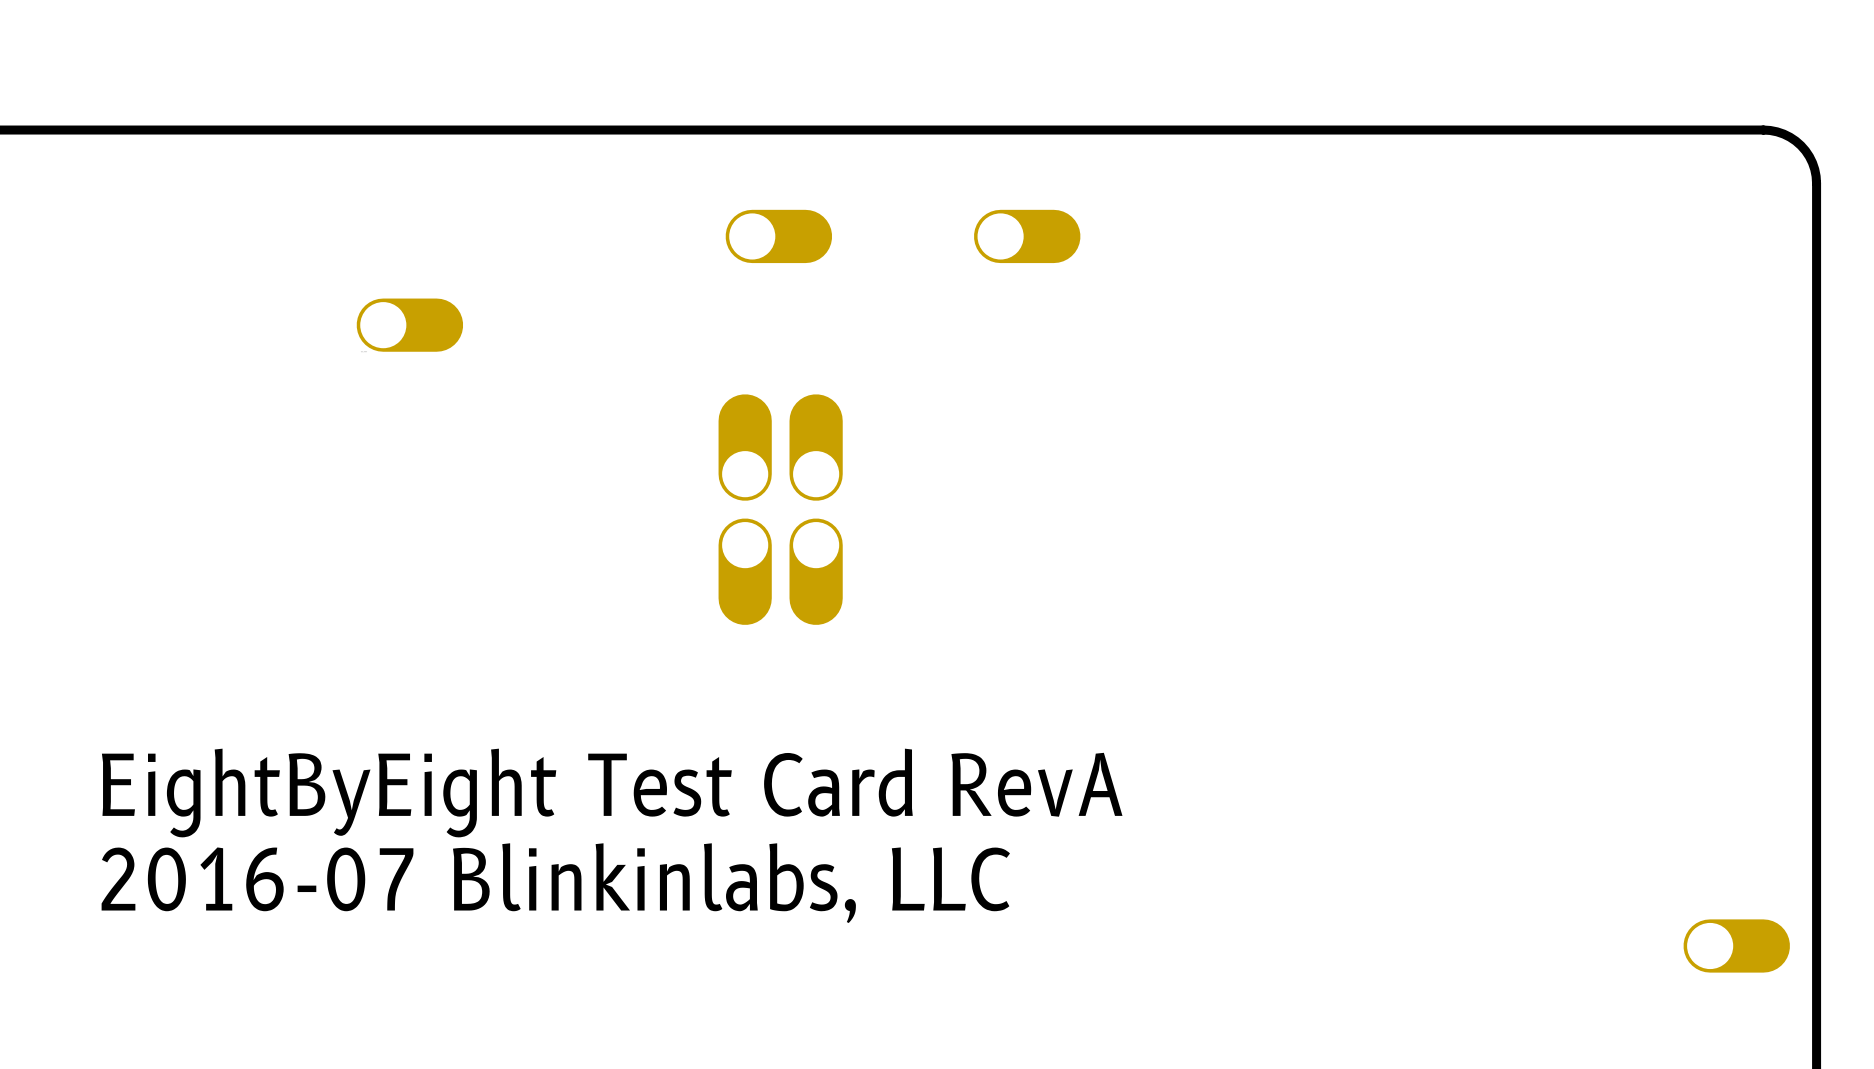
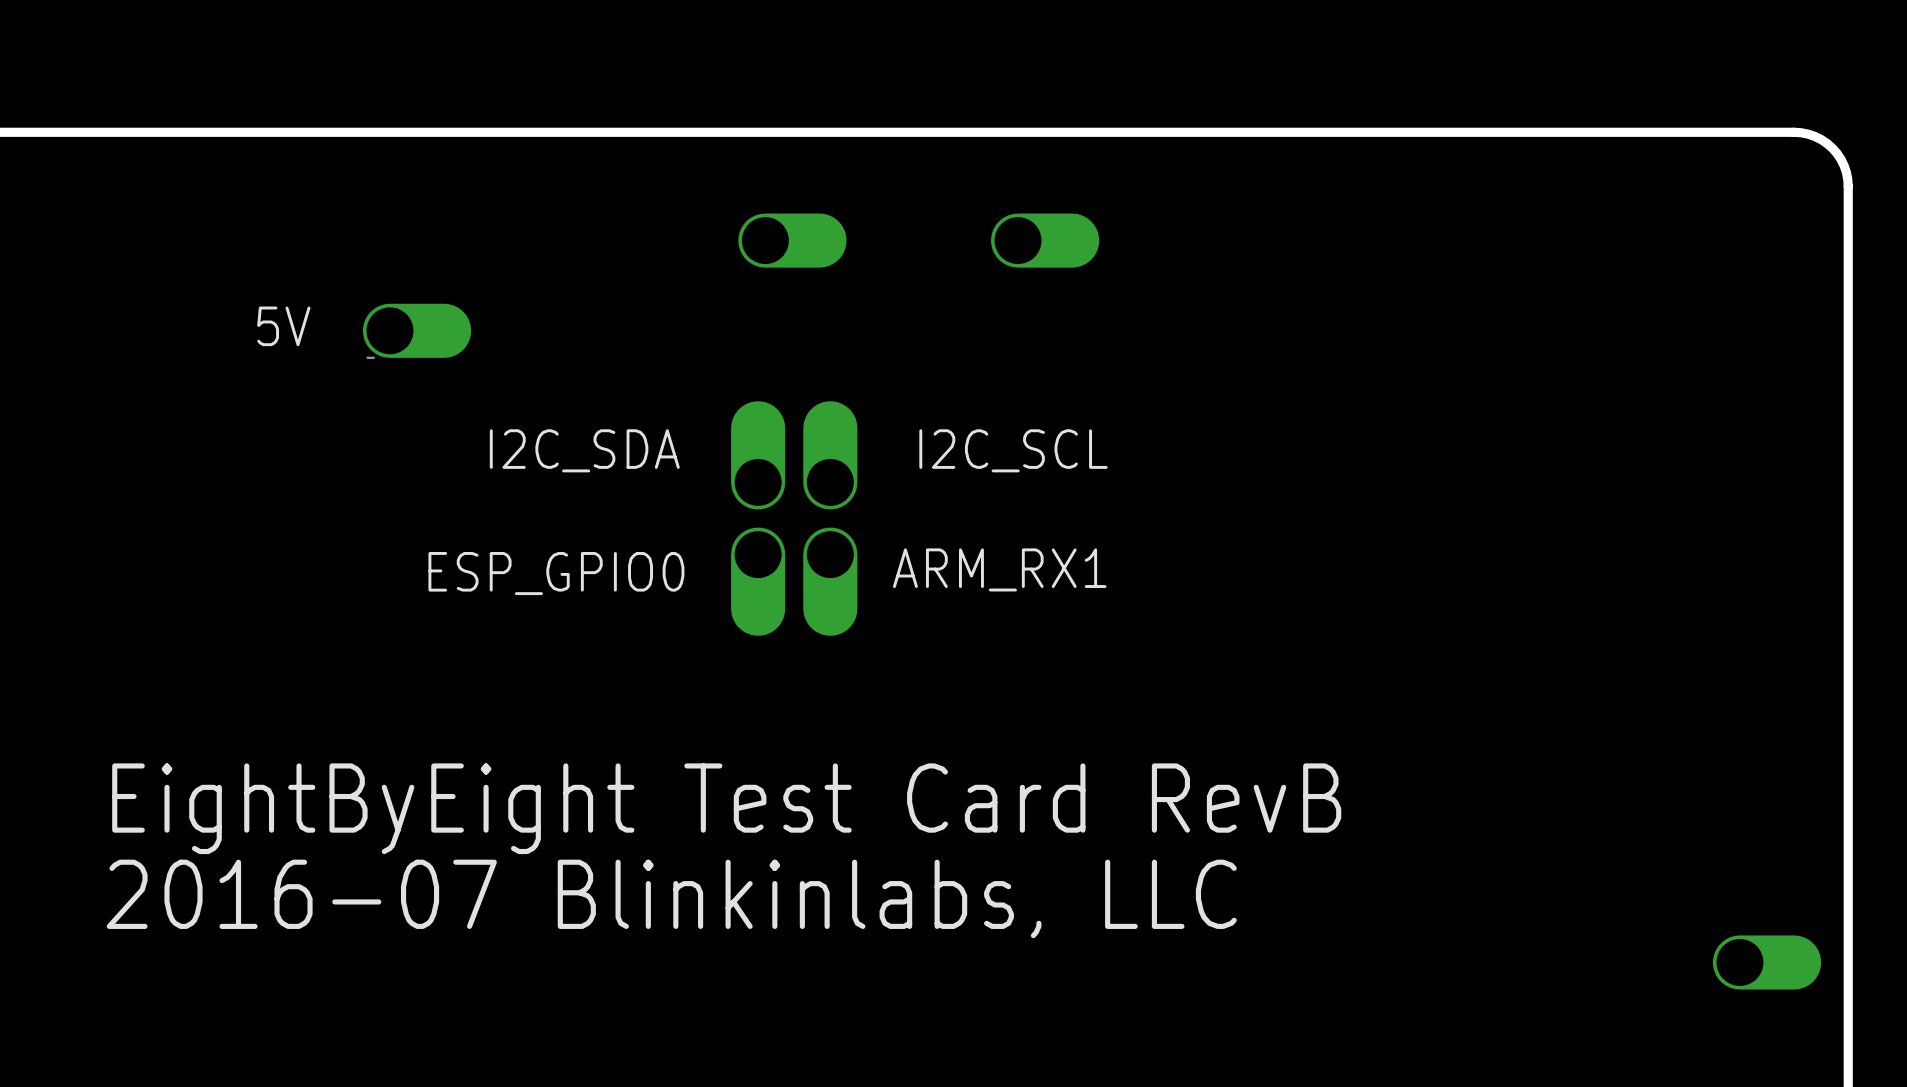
5V name: none -> 5V (283, 326)
I2C_SDA name: none -> I2C_SDA (584, 450)
I2C_SCL name: none -> I2C_SCL (1013, 450)
ARM_RX1 name: none -> ARM_RX1 (999, 569)
ESP_GPIO0 name: none -> ESP_GPIO0 (556, 573)
text: EightByEight Test Card RevA (612, 793) -> EightByEight Test Card RevB (726, 808)

